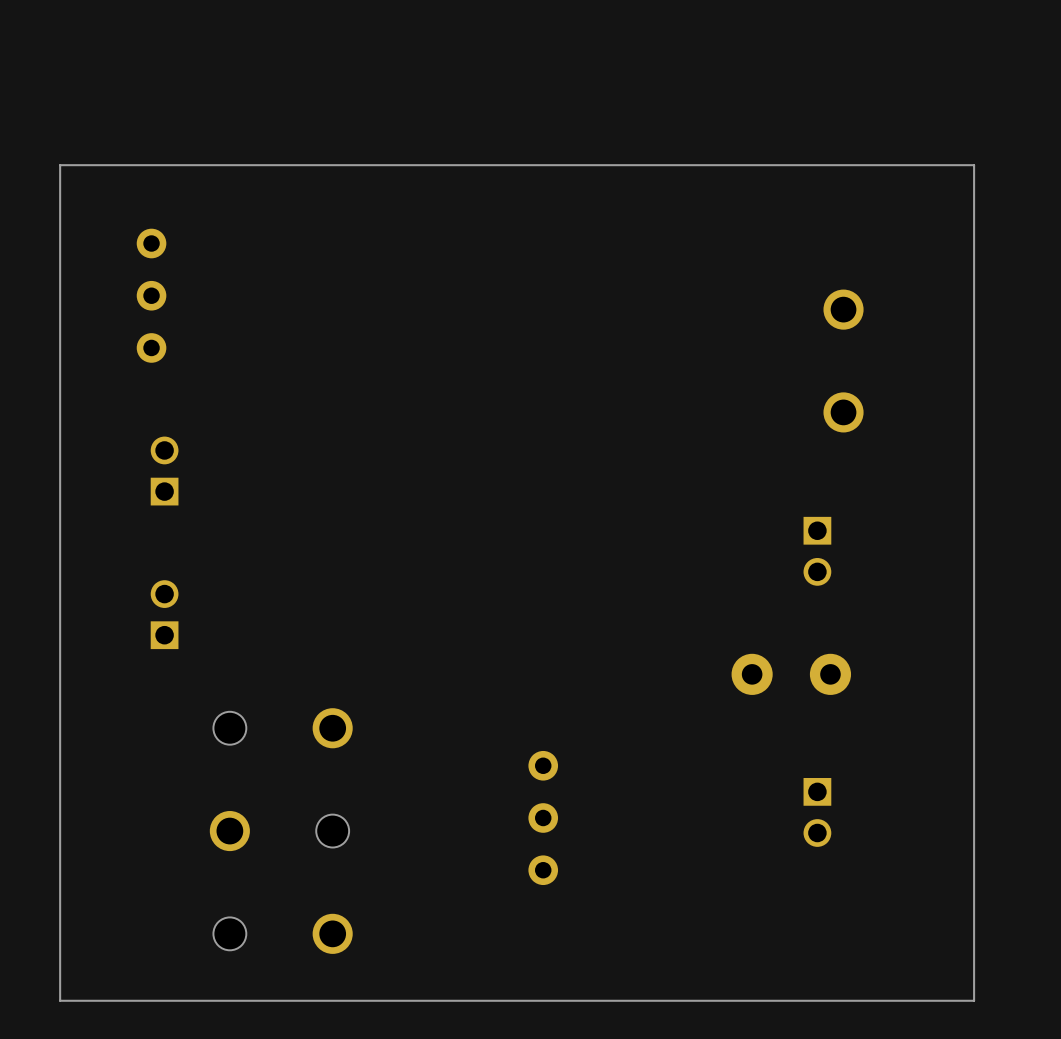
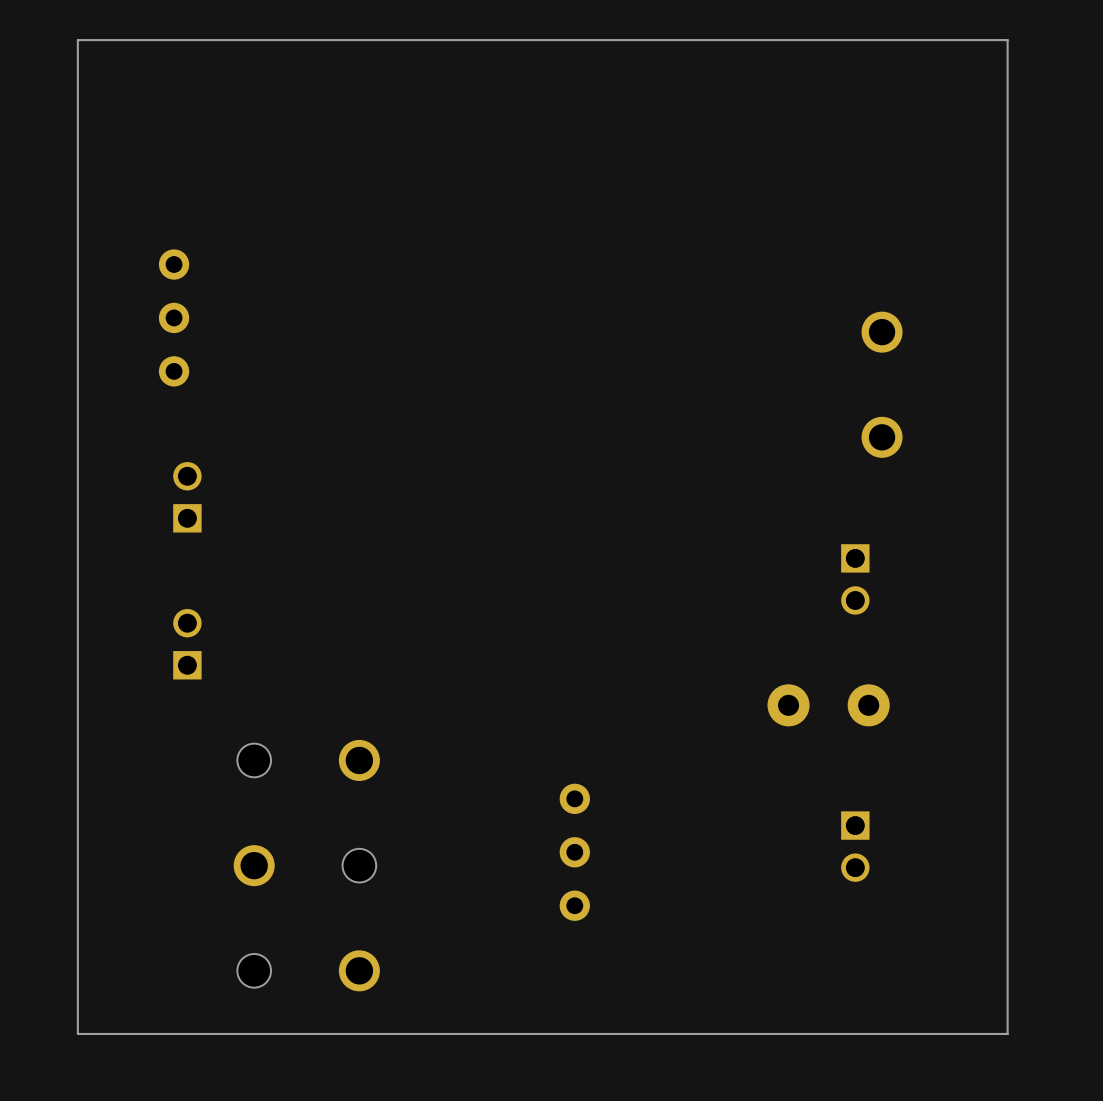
board edge: (974, 165) (60, 165) (60, 1000) (974, 1000) (974, 165) -> (1007, 40) (1007, 1033) (77, 1033) (77, 40) (1007, 40)

